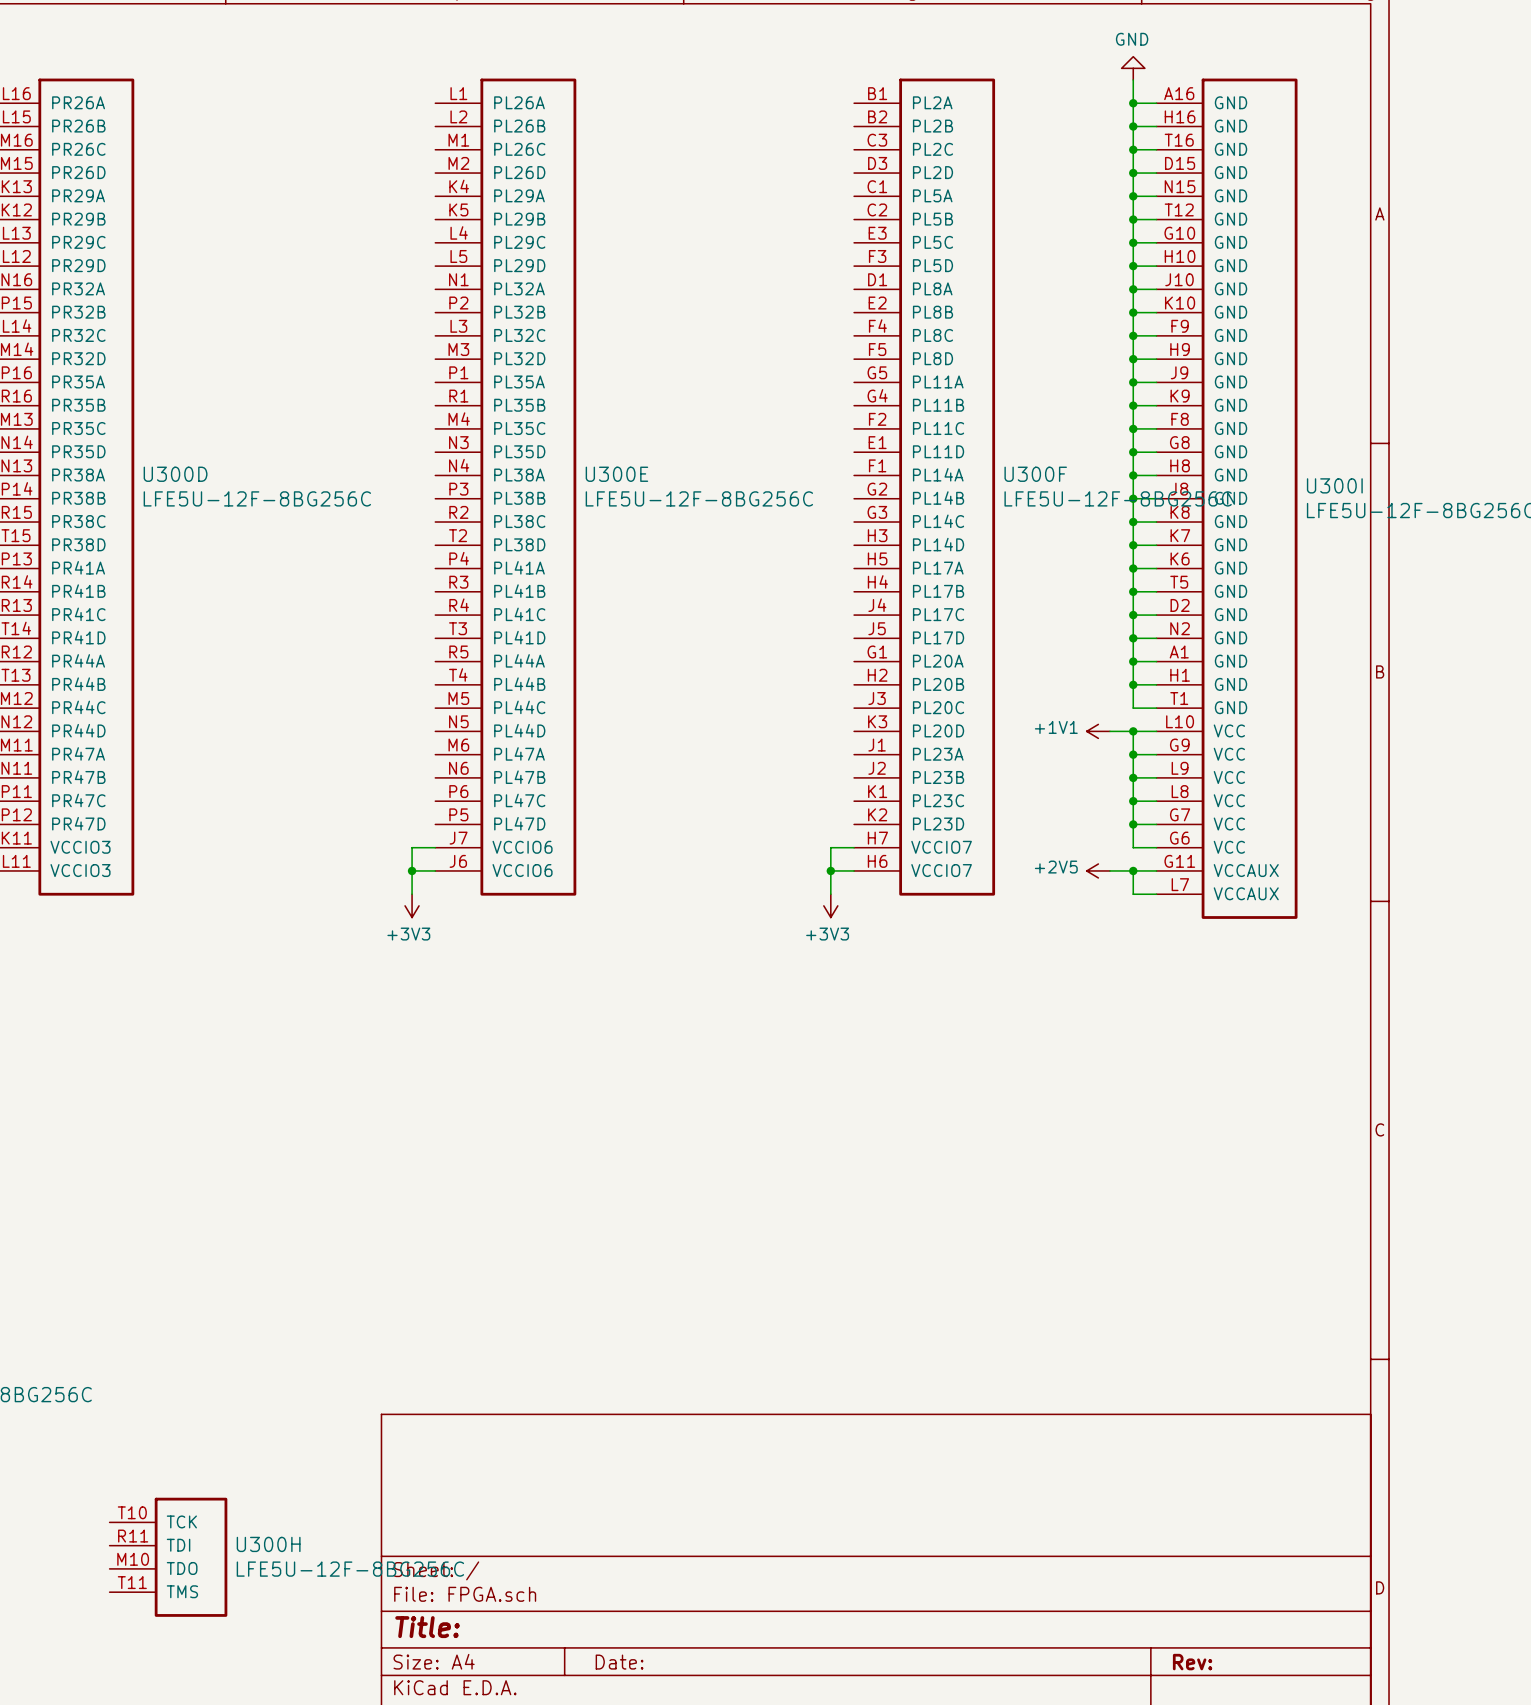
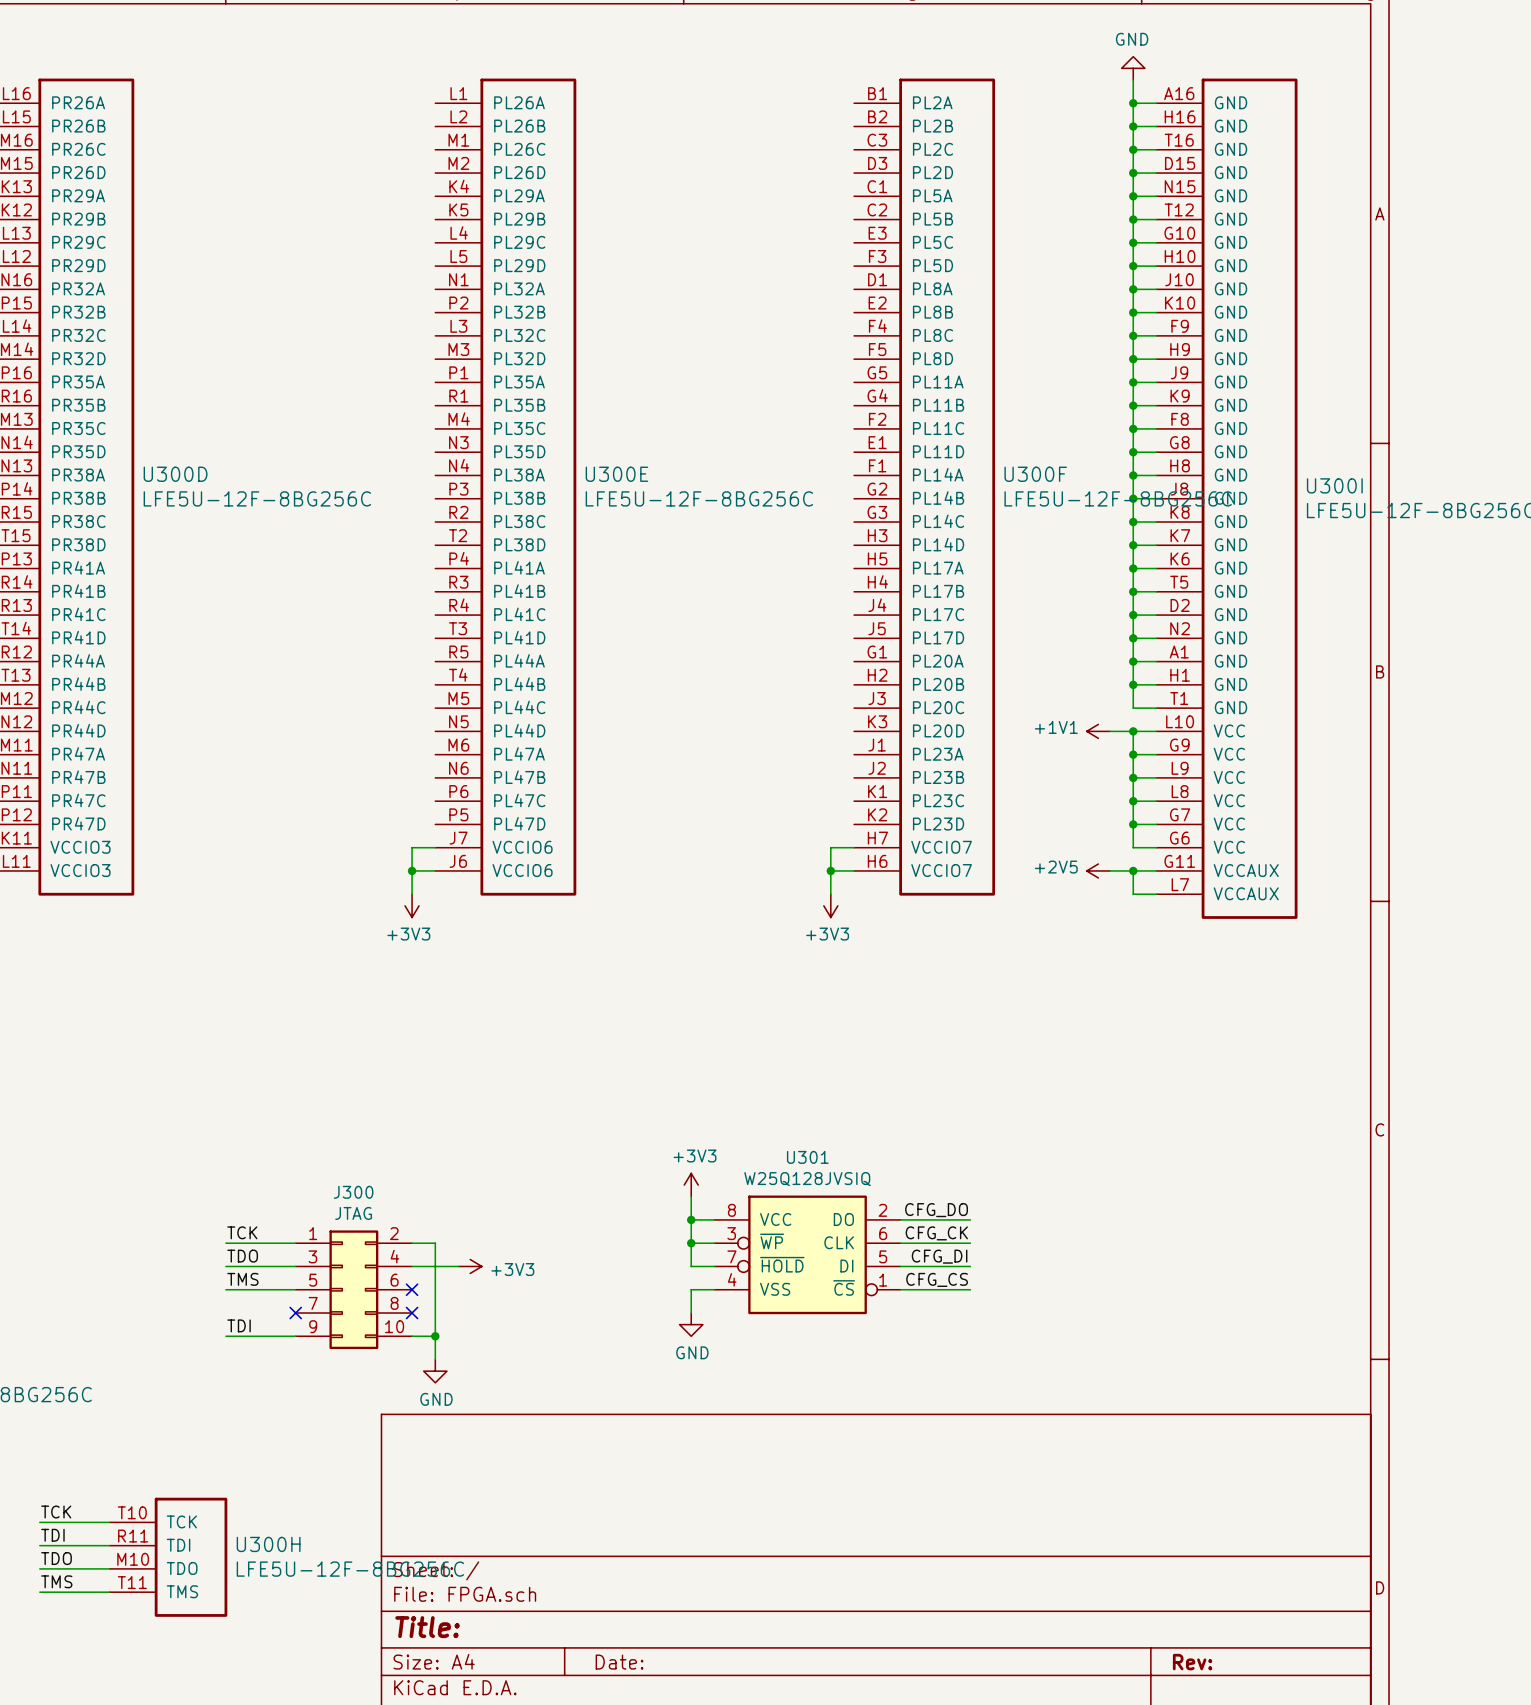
power symbol: none -> +3V3 (691, 1185)
wire: none -> (691, 1196) (691, 1266) (714, 1266)
label: none -> CFG_DO (936, 1210)
wire: none -> (691, 1219) (714, 1219)
junction: none -> (691, 1219)
wire: none -> (900, 1219) (970, 1219)
label: none -> TCK (242, 1232)
label: none -> CFG_CK (936, 1233)
wire: none -> (225, 1243) (295, 1243)
wire: none -> (412, 1243) (435, 1243) (435, 1359)
wire: none -> (691, 1243) (714, 1243)
junction: none -> (691, 1243)
wire: none -> (900, 1243) (970, 1243)
U301: none -> W25Q128JVSIQ (807, 1254)
label: none -> TDO (242, 1256)
label: none -> CFG_DI (939, 1256)
wire: none -> (225, 1266) (295, 1266)
wire: none -> (412, 1266) (458, 1266)
power symbol: none -> +3V3 (470, 1266)
wire: none -> (900, 1266) (970, 1266)
label: none -> TMS (242, 1279)
label: none -> CFG_CS (937, 1279)
wire: none -> (225, 1289) (295, 1289)
J300: none -> JTAG (353, 1289)
no-connect mark: none -> (412, 1289)
wire: none -> (714, 1289) (691, 1289) (691, 1313)
wire: none -> (900, 1289) (970, 1289)
no-connect mark: none -> (295, 1313)
no-connect mark: none -> (412, 1313)
power symbol: none -> GND (691, 1324)
label: none -> TDI (239, 1325)
wire: none -> (225, 1336) (295, 1336)
wire: none -> (412, 1336) (435, 1336)
junction: none -> (435, 1336)
power symbol: none -> GND (435, 1371)
label: none -> TCK (56, 1512)
wire: none -> (39, 1522) (109, 1522)
label: none -> TDI (52, 1535)
wire: none -> (39, 1545) (109, 1545)
label: none -> TDO (56, 1558)
wire: none -> (39, 1568) (109, 1568)
label: none -> TMS (56, 1581)
wire: none -> (39, 1592) (109, 1592)

